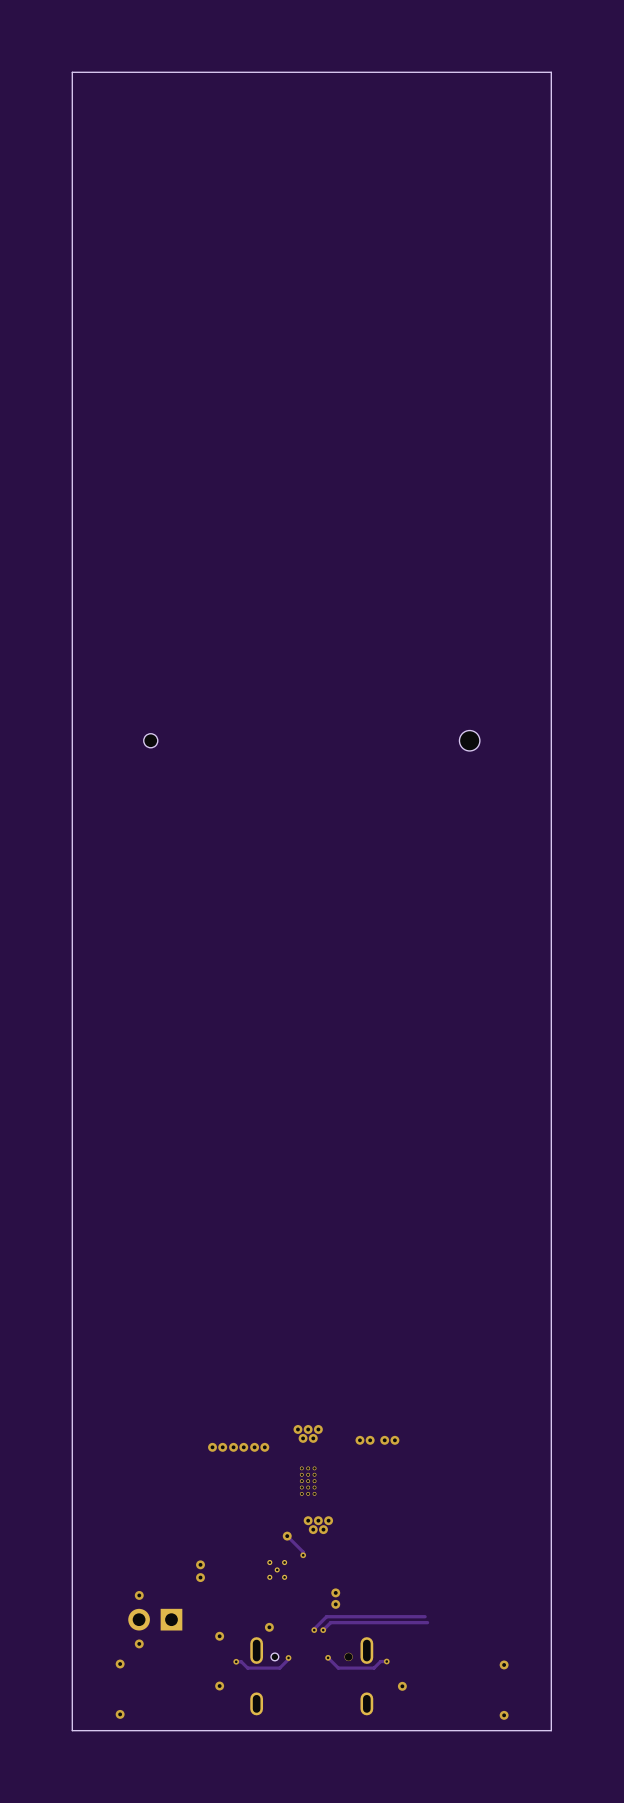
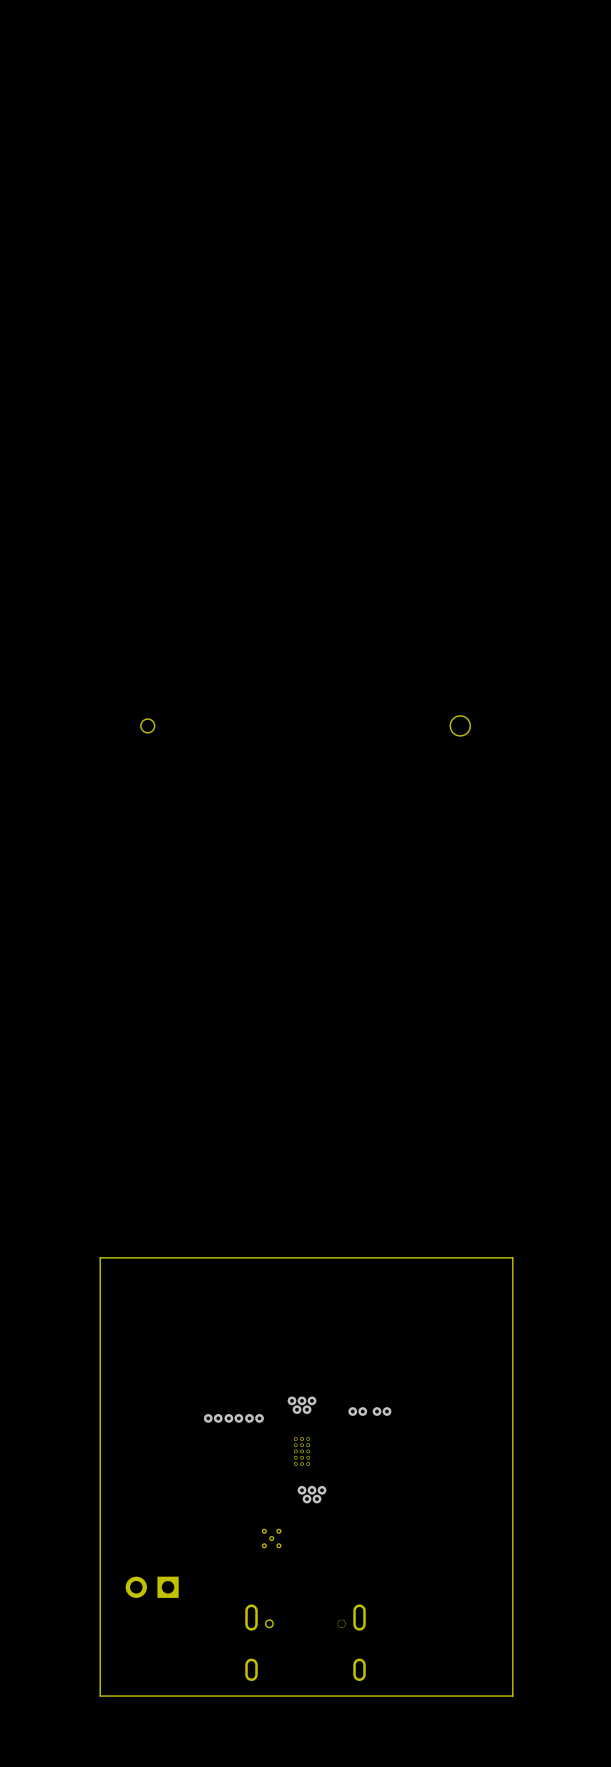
track: (287, 1536) (303, 1552) (303, 1555) -> none
via: (287, 1536) -> none
via: (303, 1555) -> none
via: (200, 1564) -> none
via: (200, 1577) -> none
via: (335, 1592) -> none
via: (139, 1595) -> none
via: (335, 1604) -> none
track: (425, 1616) (326, 1616) (314, 1630) -> none
track: (427, 1622) (330, 1622) (323, 1630) -> none
via: (269, 1627) -> none
via: (314, 1630) -> none
via: (323, 1630) -> none
via: (219, 1636) -> none
via: (139, 1643) -> none
track: (288, 1657) (279, 1668) (247, 1668) (241, 1661) (236, 1661) -> none
via: (288, 1657) -> none
track: (328, 1657) (338, 1668) (374, 1668) (380, 1661) (386, 1661) -> none
via: (328, 1657) -> none
via: (236, 1661) -> none
via: (386, 1661) -> none
via: (120, 1664) -> none
via: (504, 1664) -> none
via: (219, 1686) -> none
via: (402, 1686) -> none
via: (120, 1714) -> none
via: (504, 1715) -> none
board edge: (523, 1730) (551, 1730) (551, 72) (72, 72) (72, 1730) (102, 1730) -> (512, 1696) (512, 1257) (100, 1257) (100, 1696)

